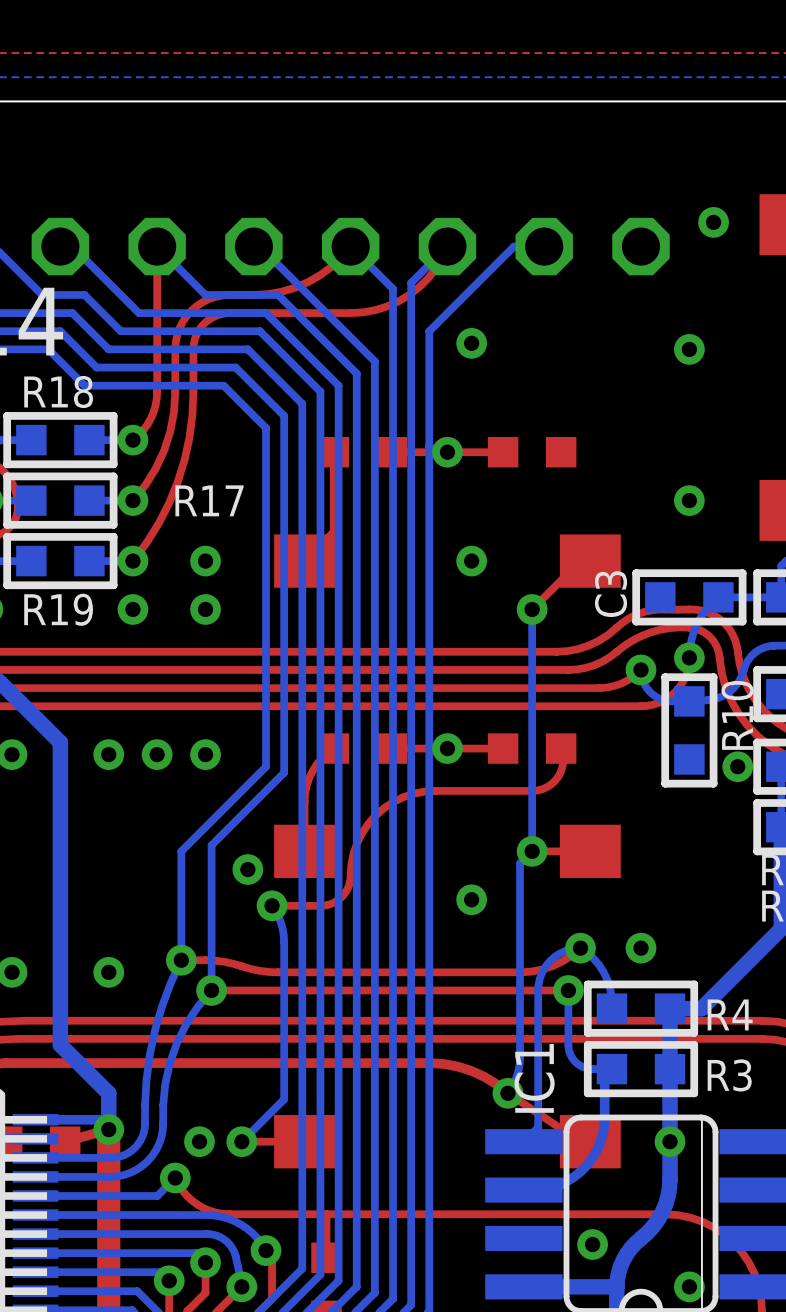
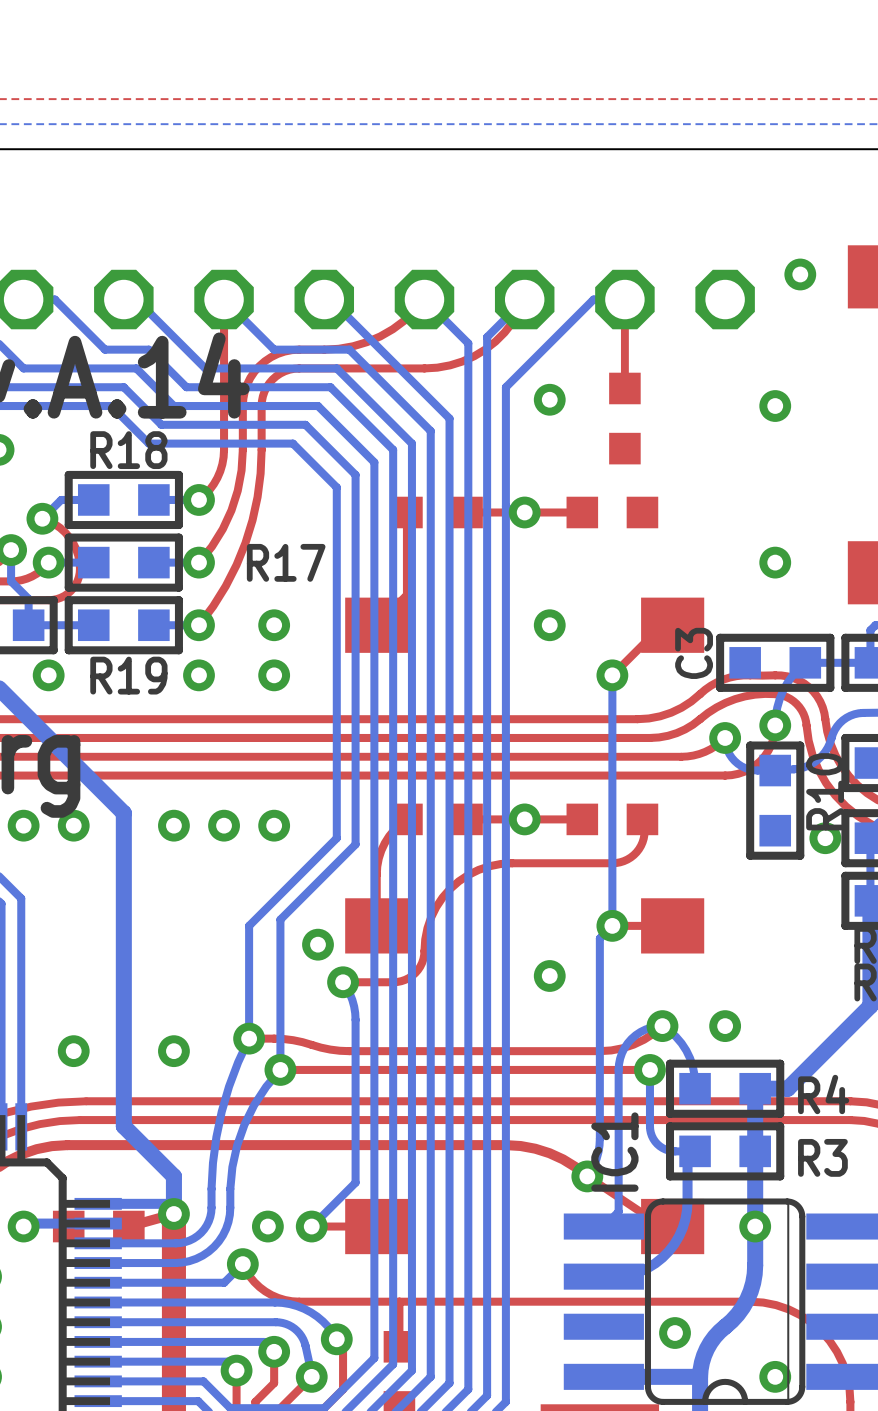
top track: none -> (624, 299) (624, 388)
part: none -> (624, 418)

